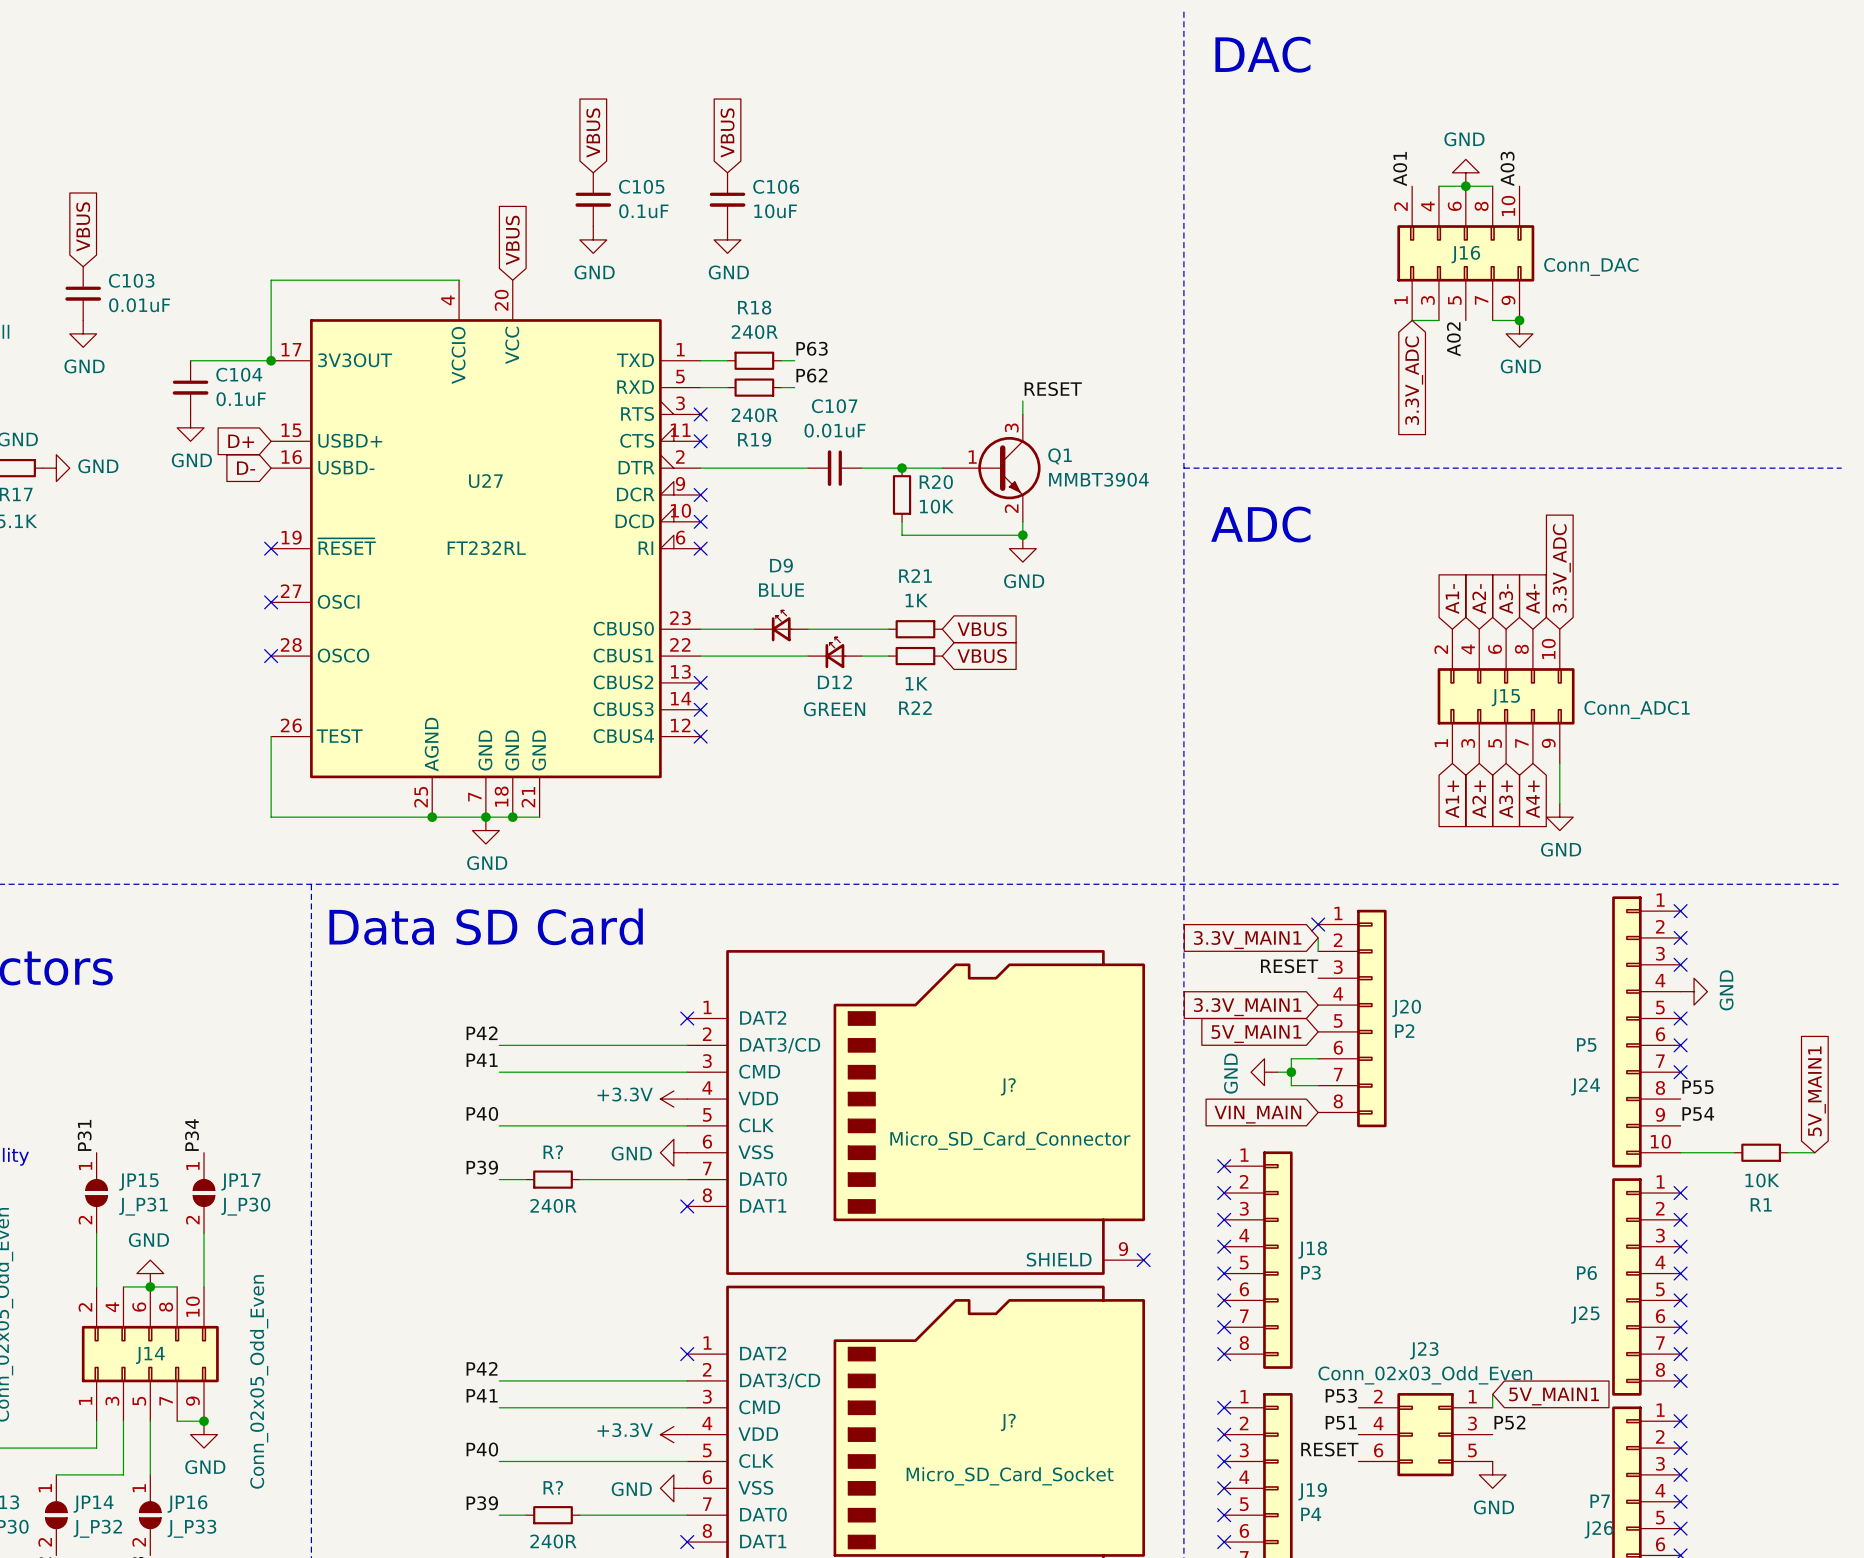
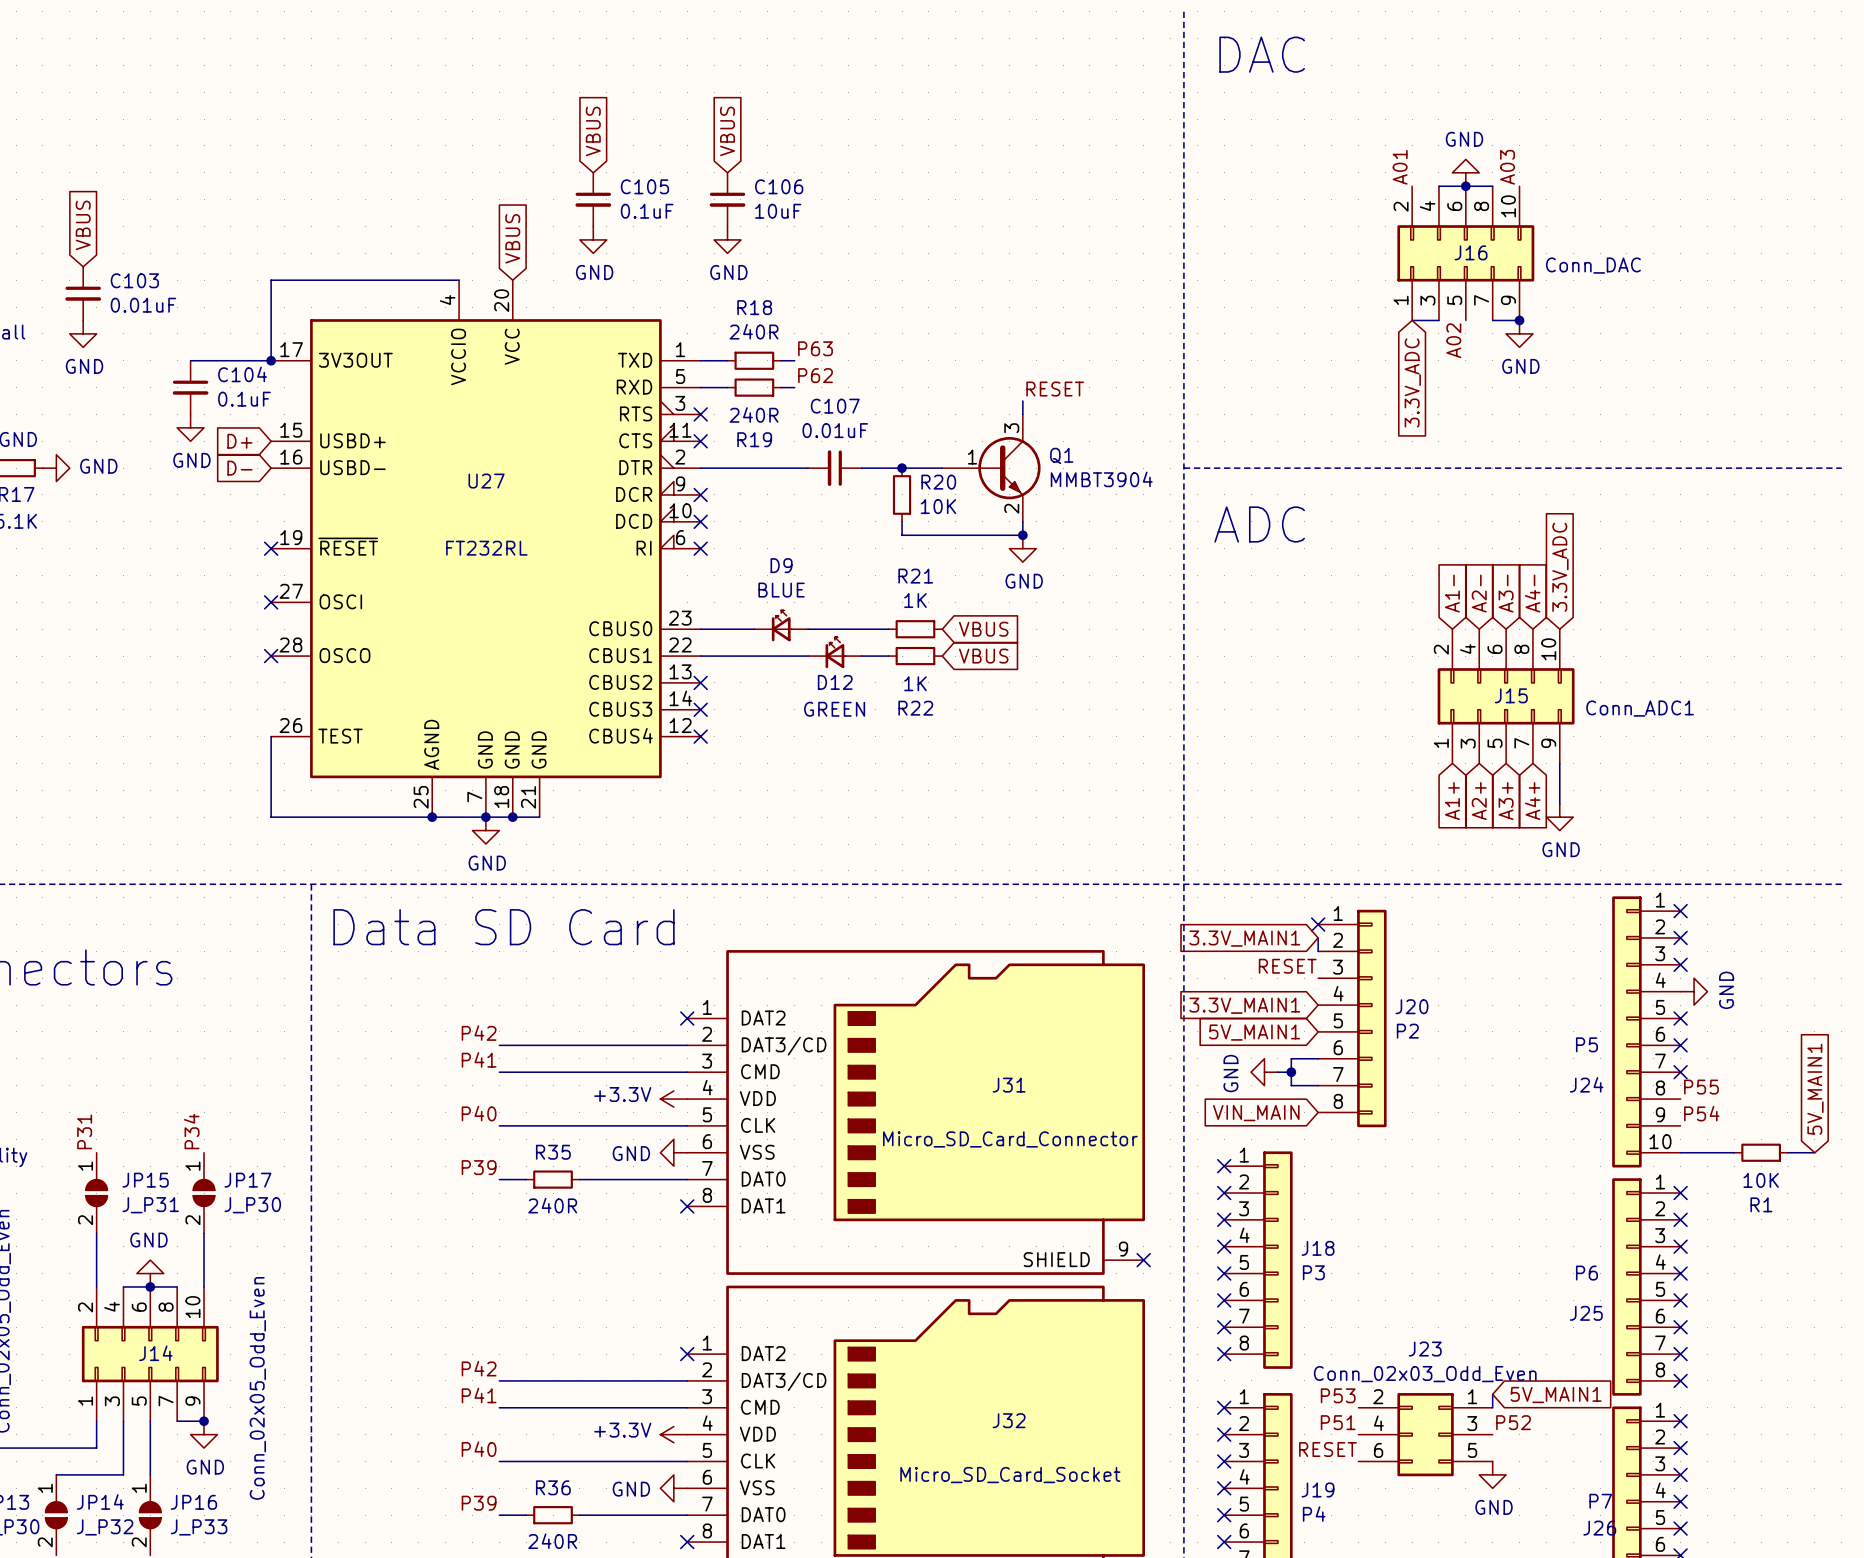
J? name: J? (1008, 1086) -> J31 (1009, 1085)
R? name: R? (553, 1152) -> R35 (553, 1152)
J? name: J? (1008, 1422) -> J32 (1009, 1420)
R? name: R? (553, 1487) -> R36 (553, 1487)

